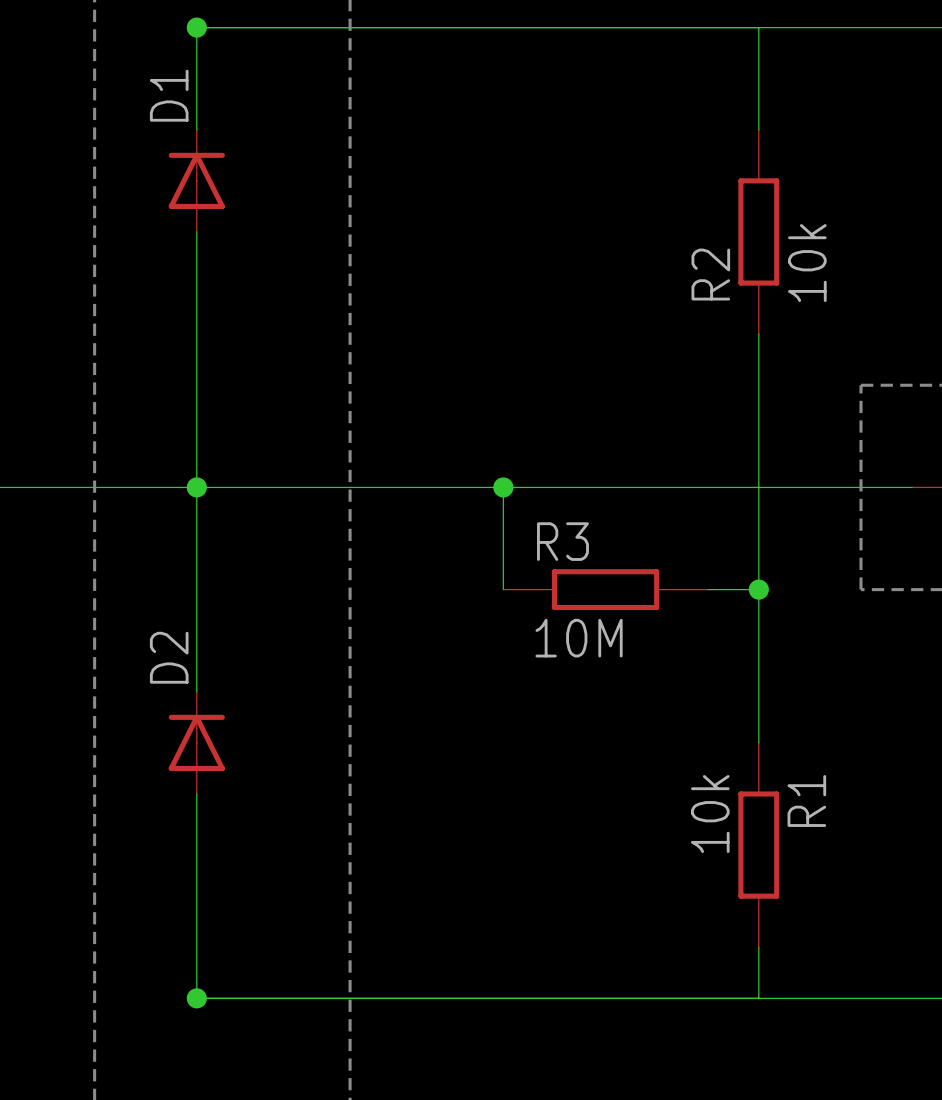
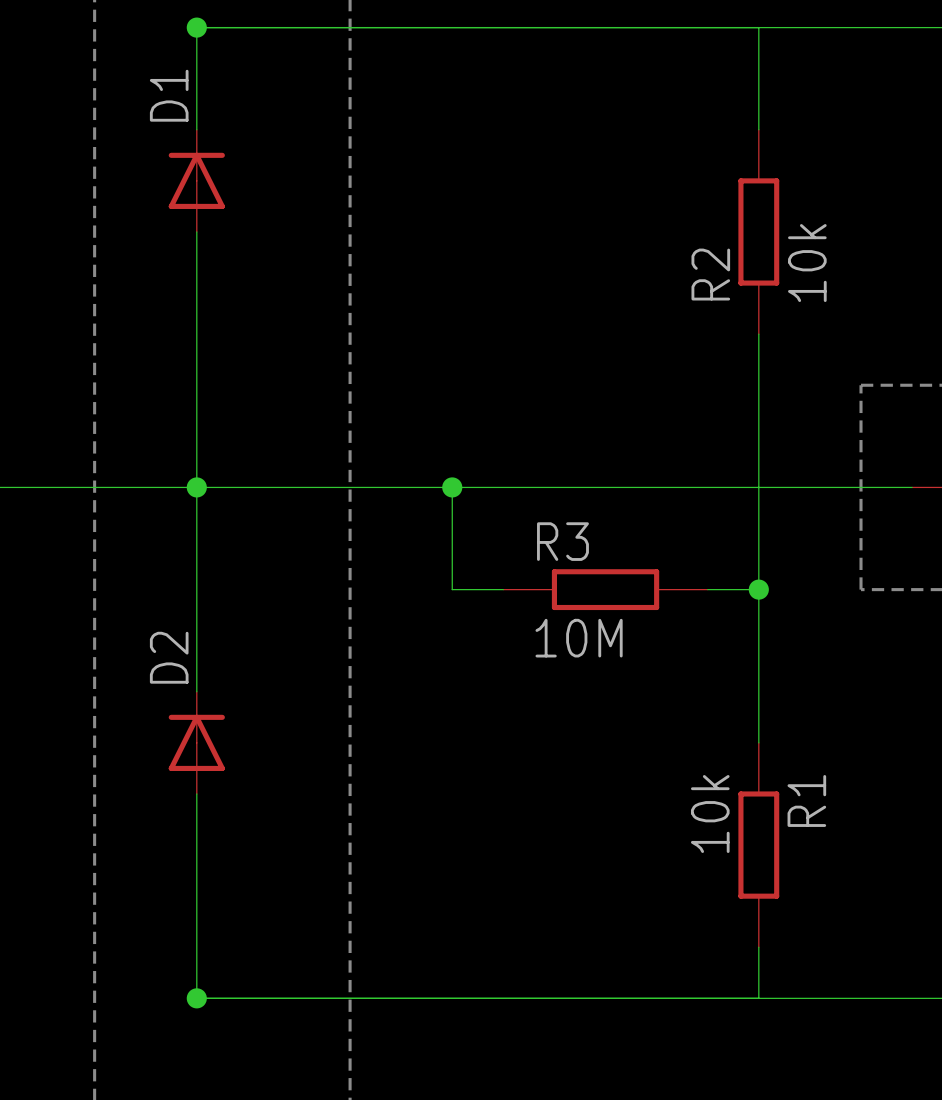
wire: (503, 487) (503, 589) -> (452, 487) (452, 589) (503, 589)
junction position: (503, 487) -> (452, 487)

